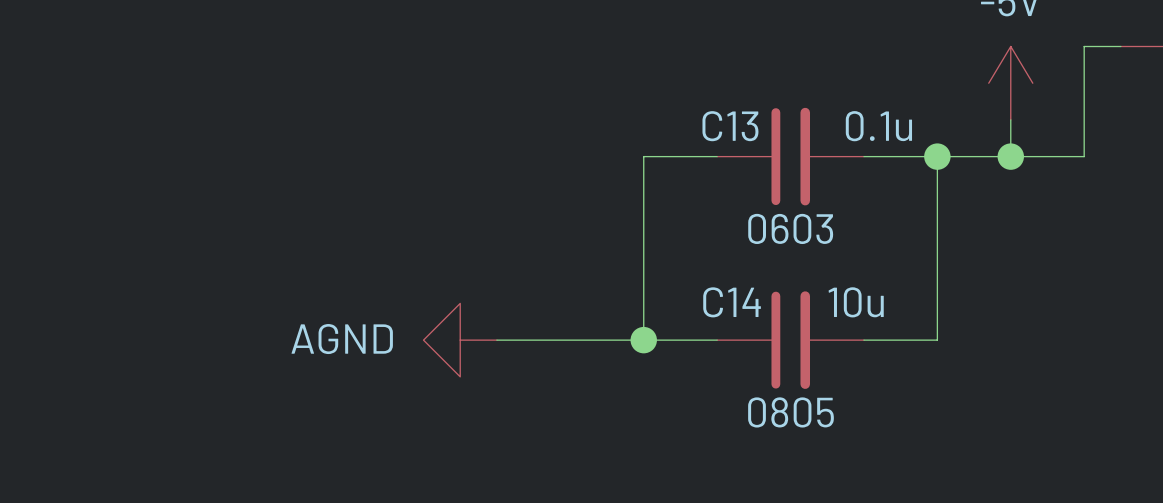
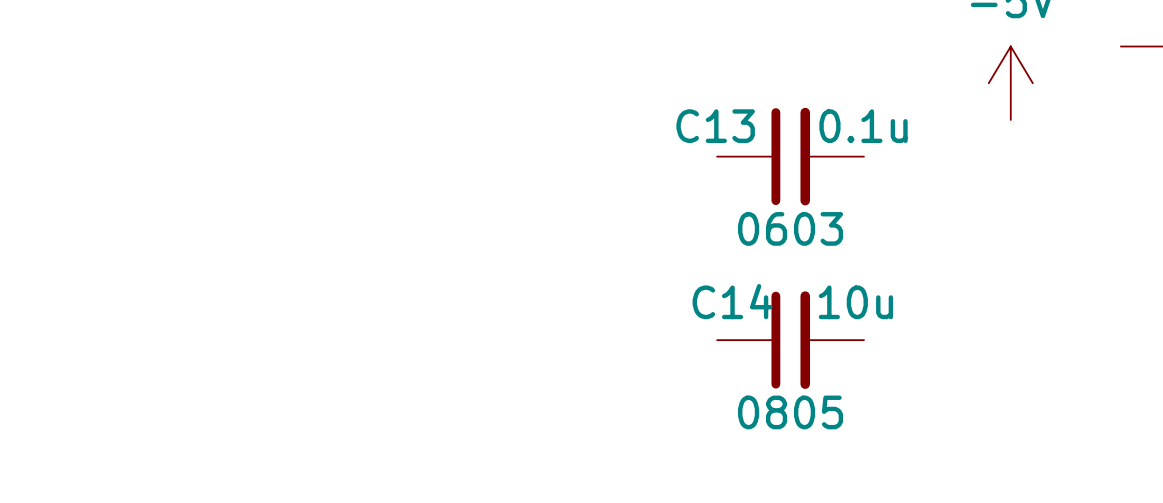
wire: (1120, 46) (1084, 46) (1084, 156) (863, 156) -> none
wire: (1010, 119) (1010, 156) -> none
wire: (717, 156) (643, 156) (643, 340) -> none
wire: (937, 156) (937, 340) (863, 340) -> none
junction: (937, 156) -> none
junction: (1010, 156) -> none
power symbol: AGND (460, 340) -> none
wire: (496, 340) (717, 340) -> none
junction: (643, 340) -> none

